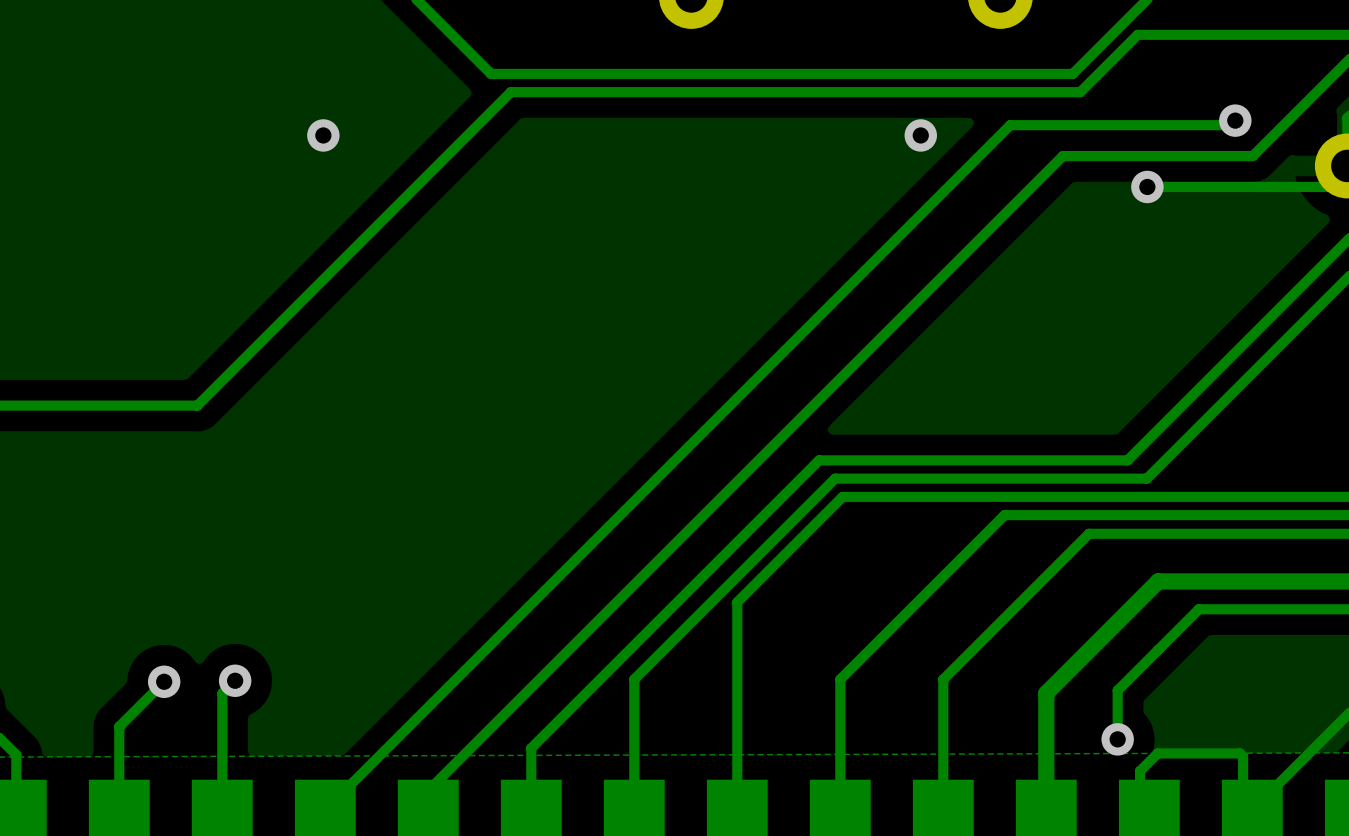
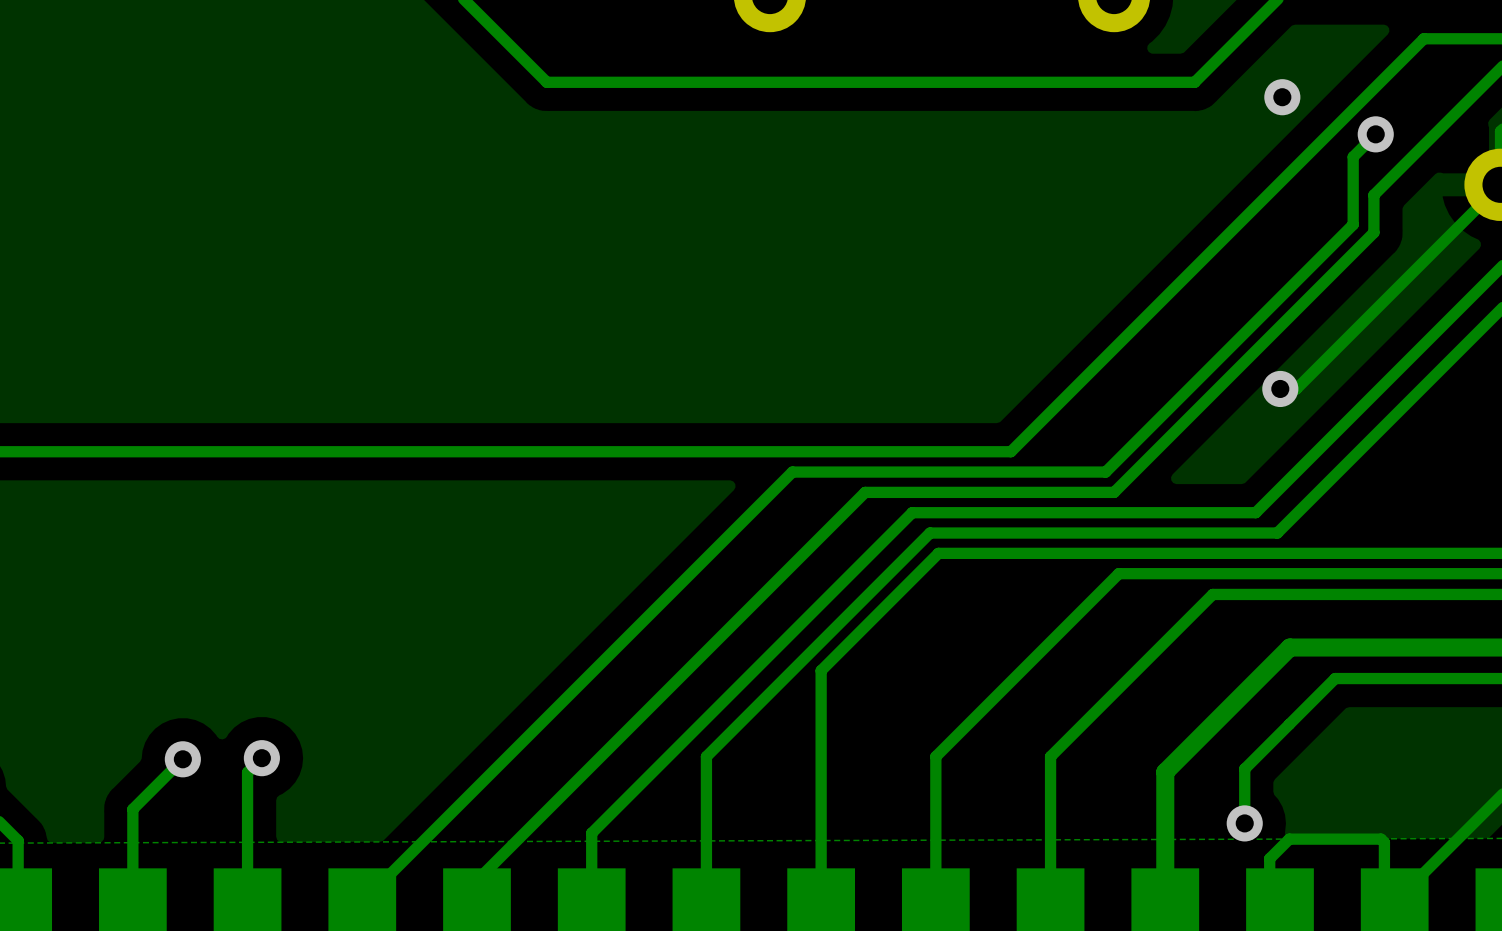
track: (1278, 34) (1137, 34) (1080, 92) (510, 92) (197, 405) -> (1423, 38) (1010, 451) (219, 451)
via: none -> (1282, 97)
track: (1230, 125) (1010, 125) (711, 423) -> (1370, 139) (1353, 156) (1353, 224) (1105, 472) (792, 472)
via: (323, 135) -> none
via: (920, 135) -> none
track: (1252, 156) (1062, 156) (776, 442) -> (1395, 173) (1373, 195) (1373, 232) (1114, 492) (865, 492)
via: (1147, 186) -> none
track: (1326, 186) (1147, 186) -> (1477, 208) (1296, 388) (1280, 388)
via: none -> (1280, 388)

